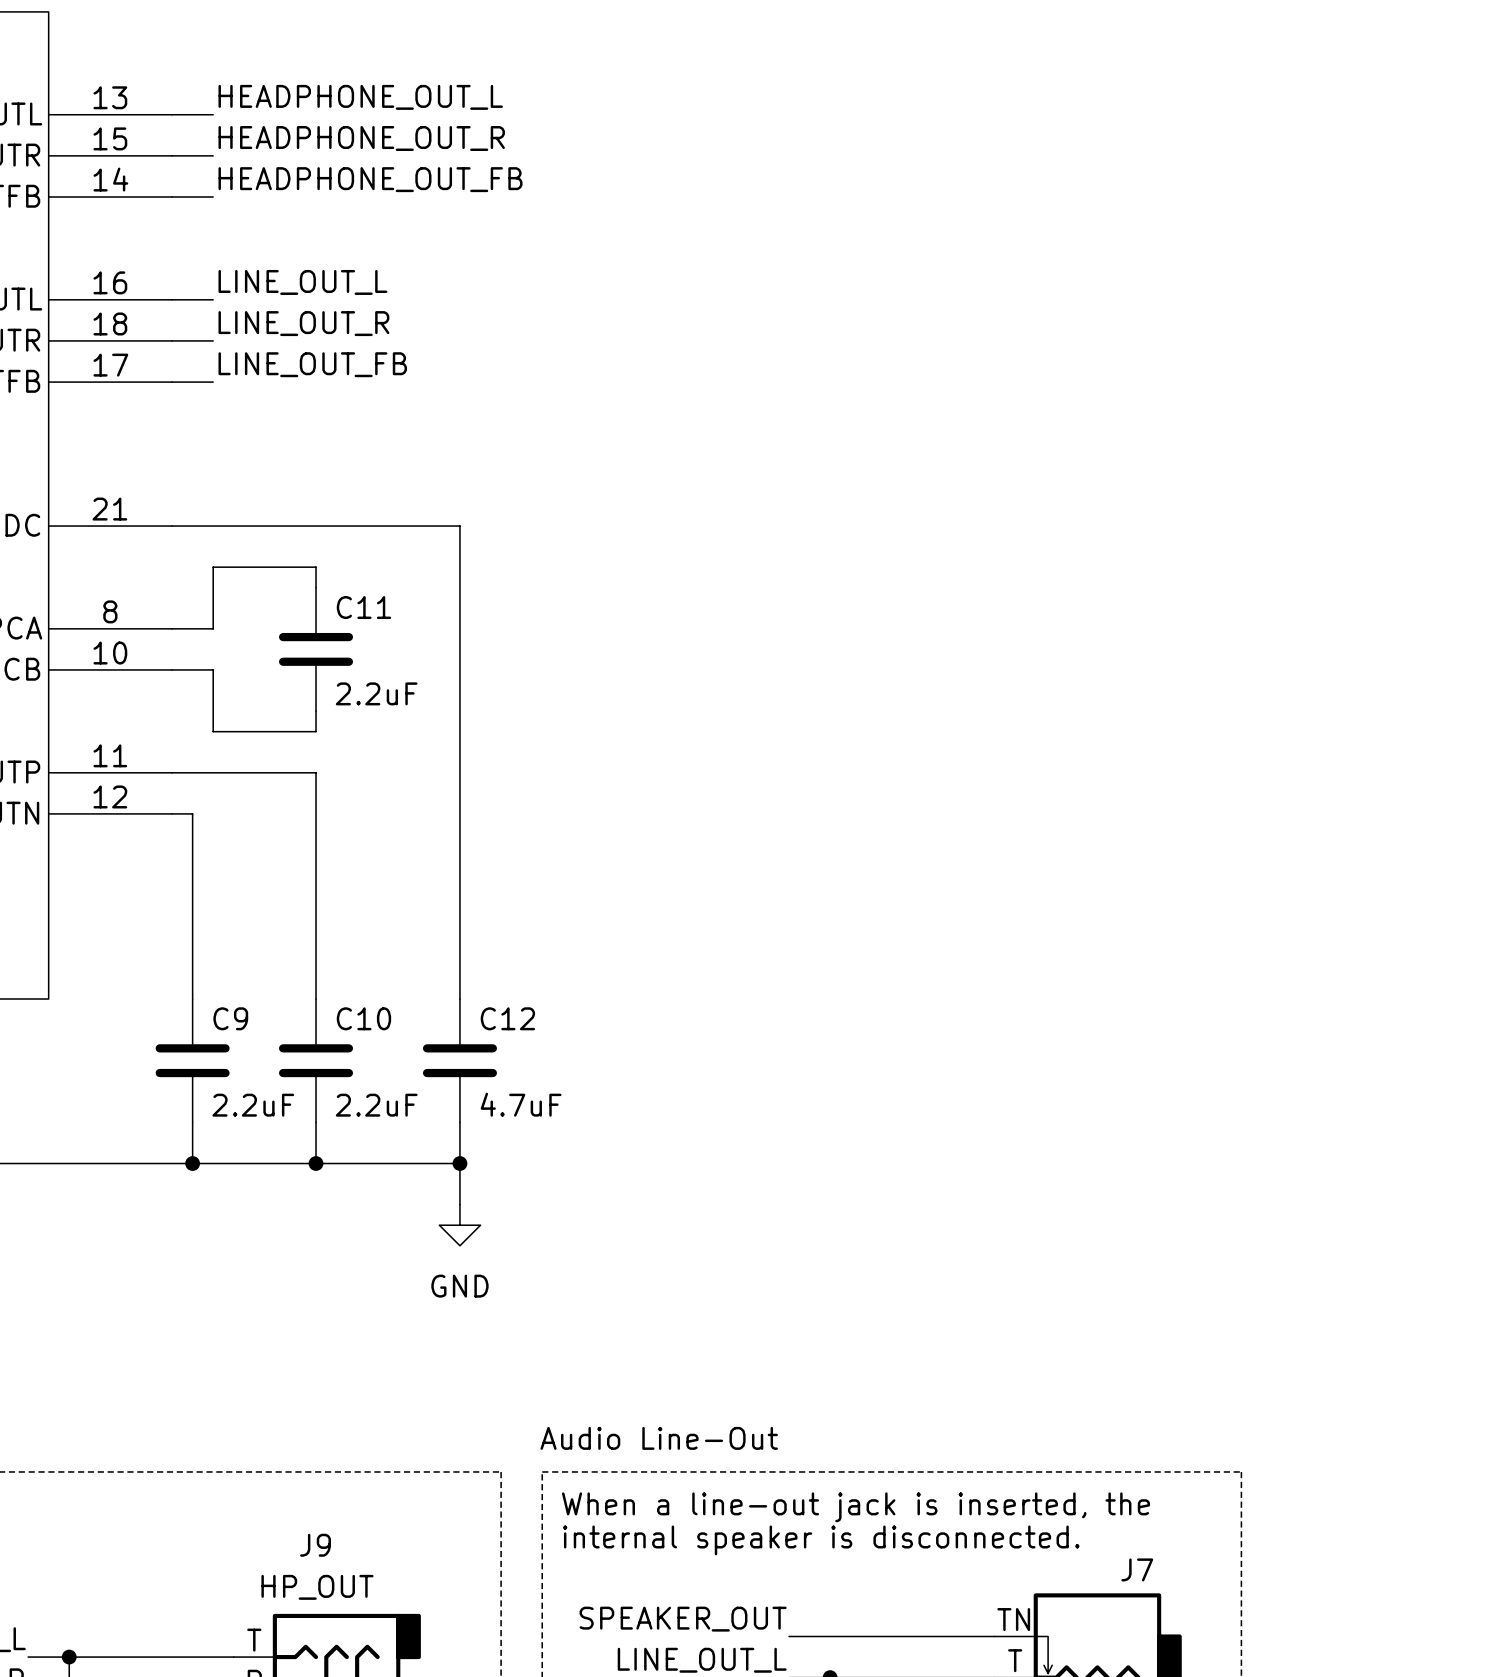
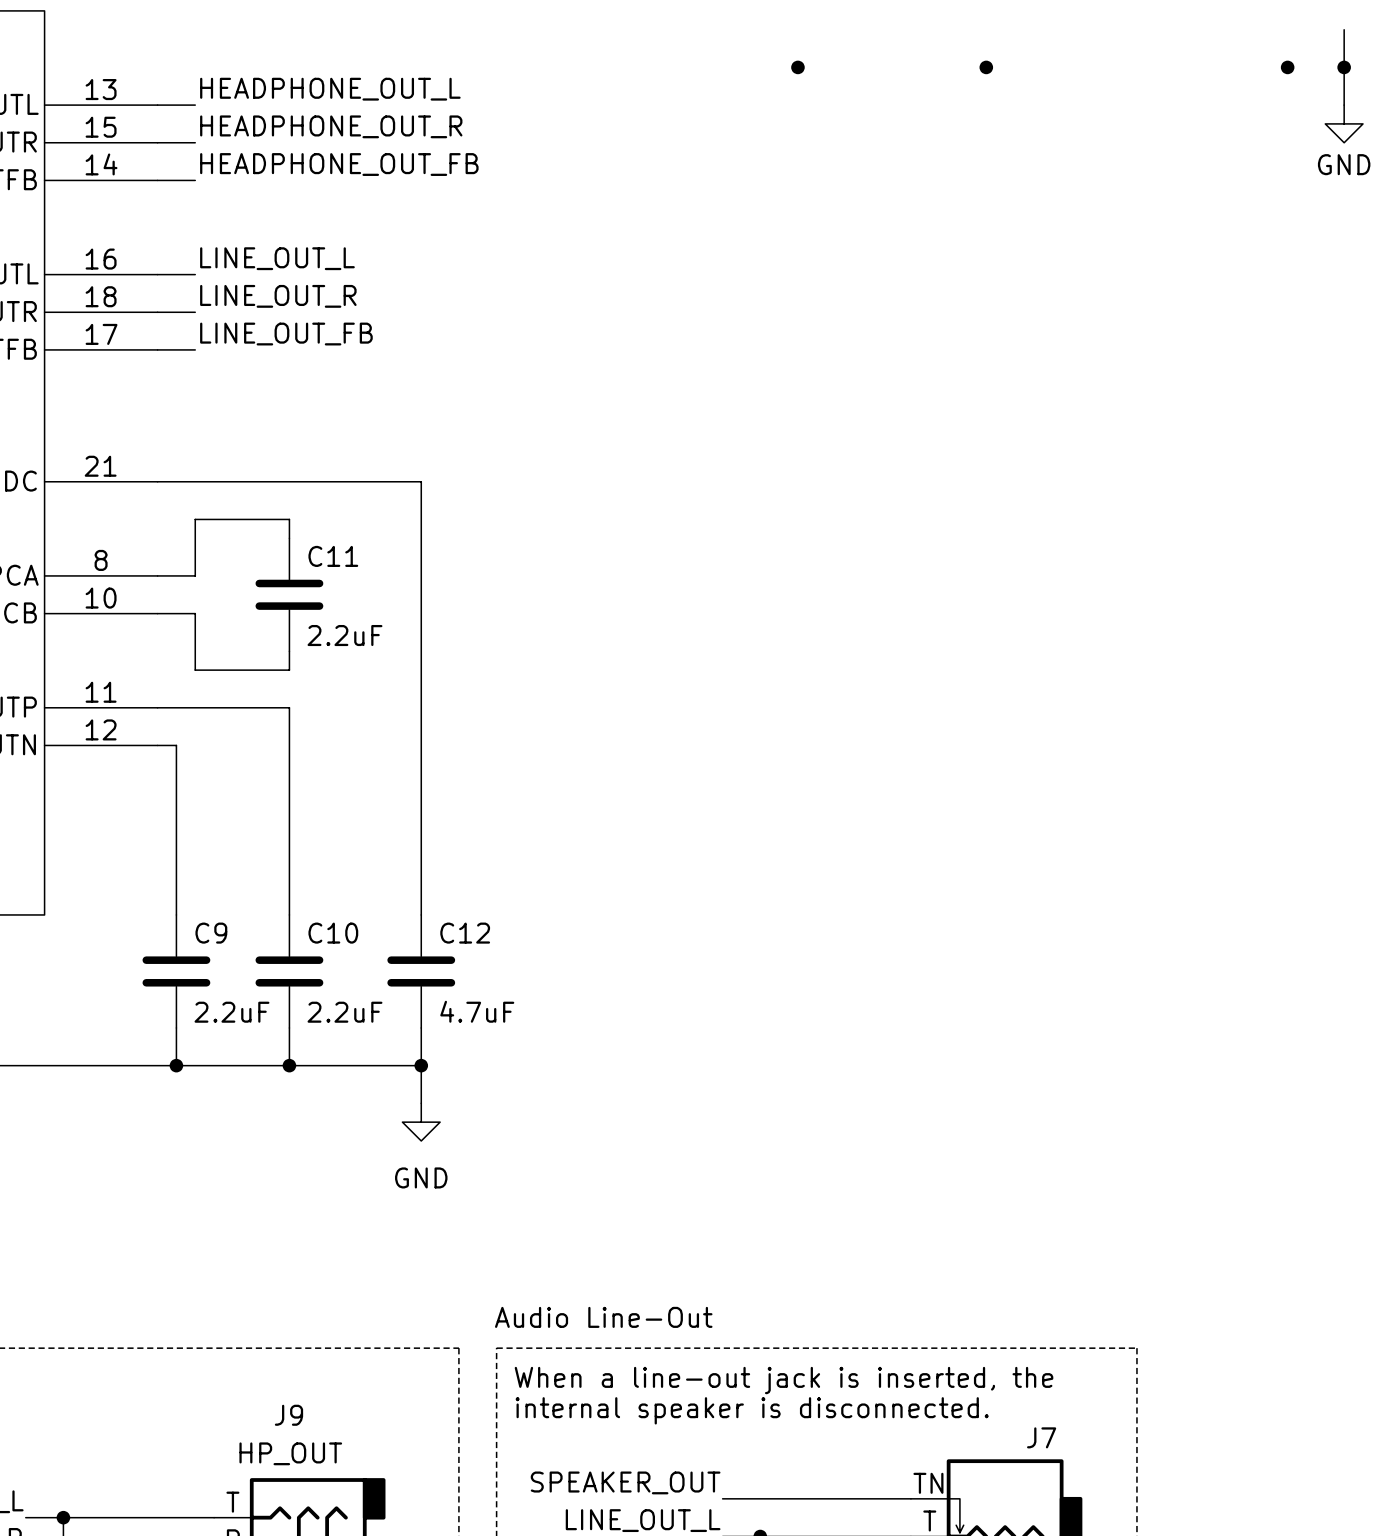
wire: none -> (1344, 29) (1344, 105)
junction: none -> (797, 67)
junction: none -> (986, 67)
junction: none -> (1287, 67)
junction: none -> (1344, 67)
power symbol: none -> GND (1344, 123)

